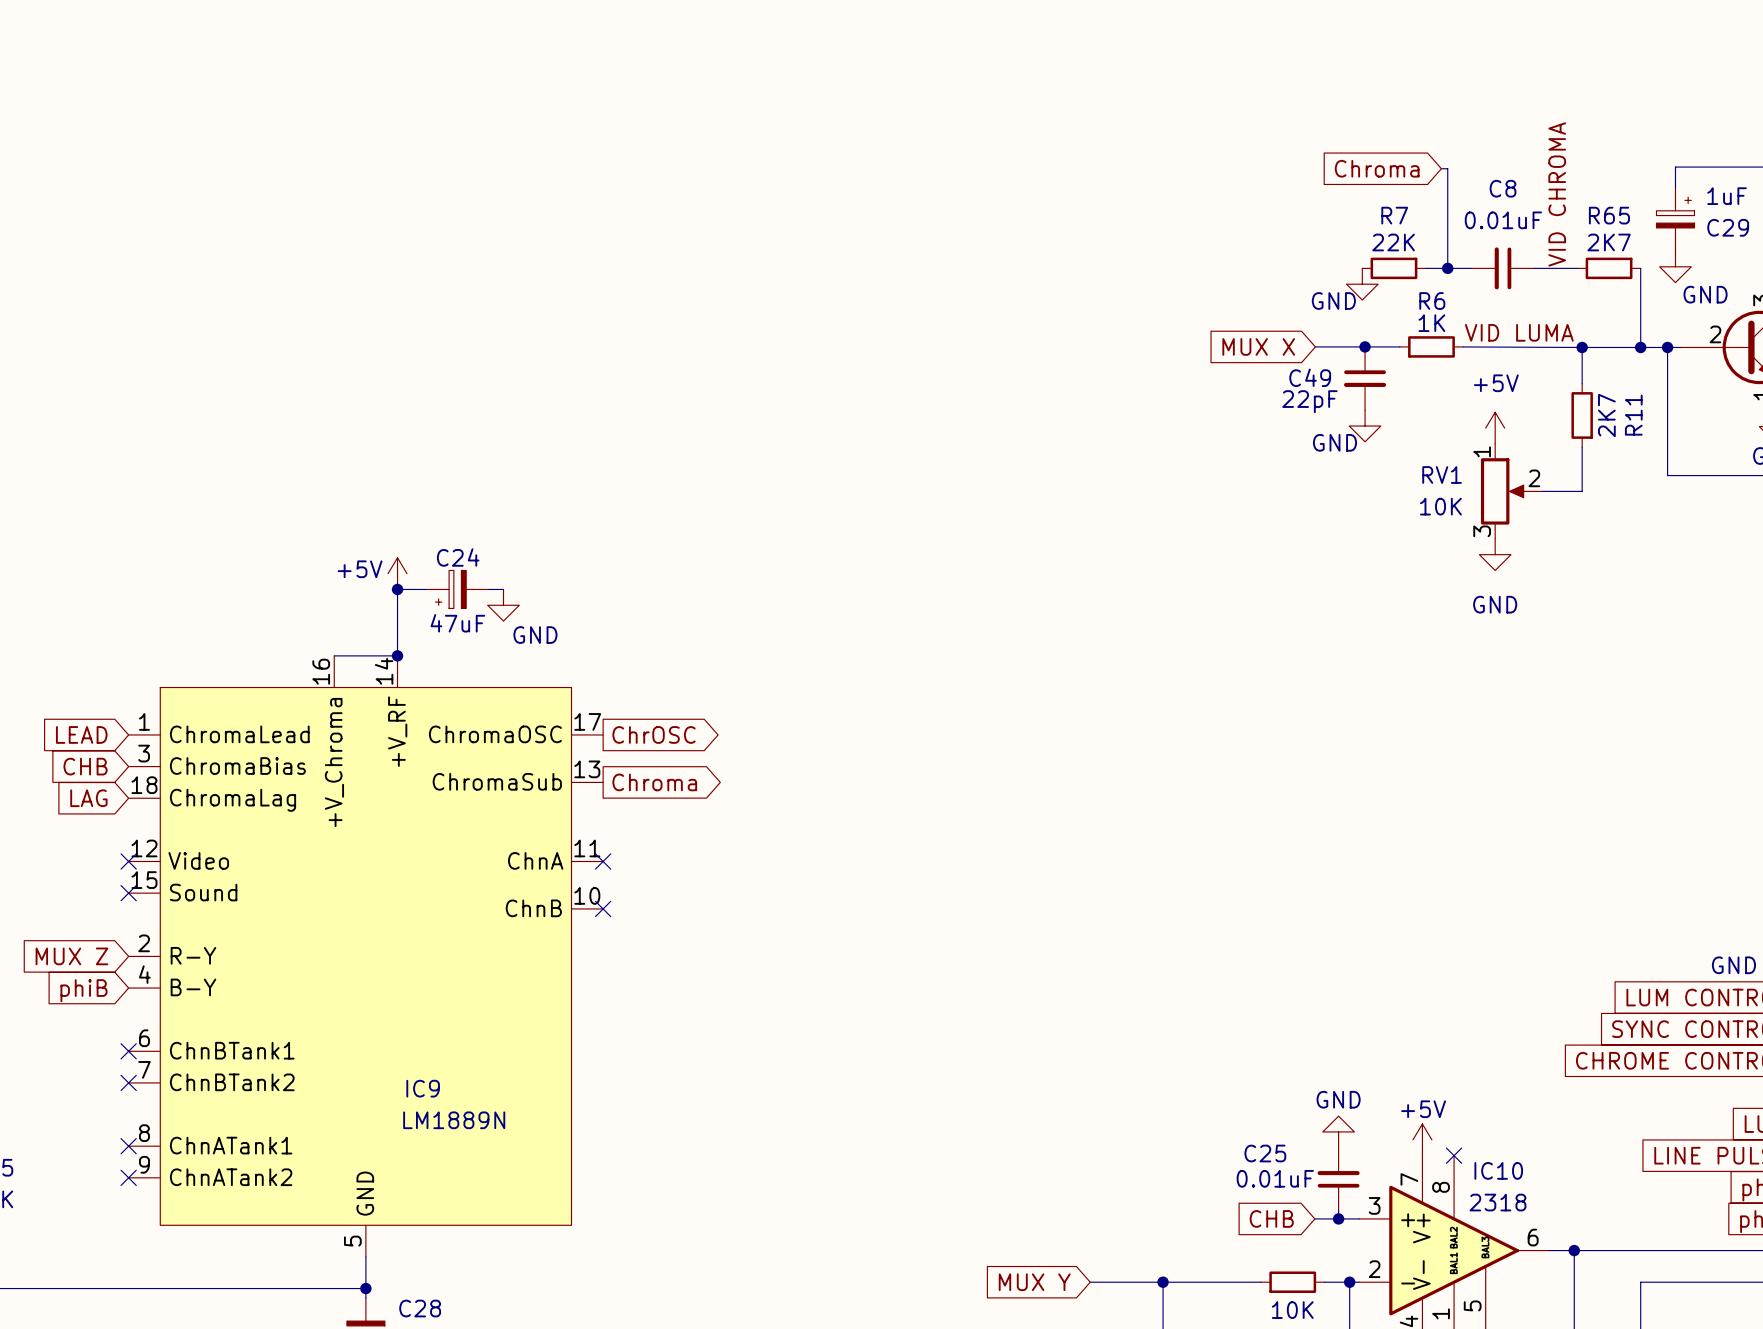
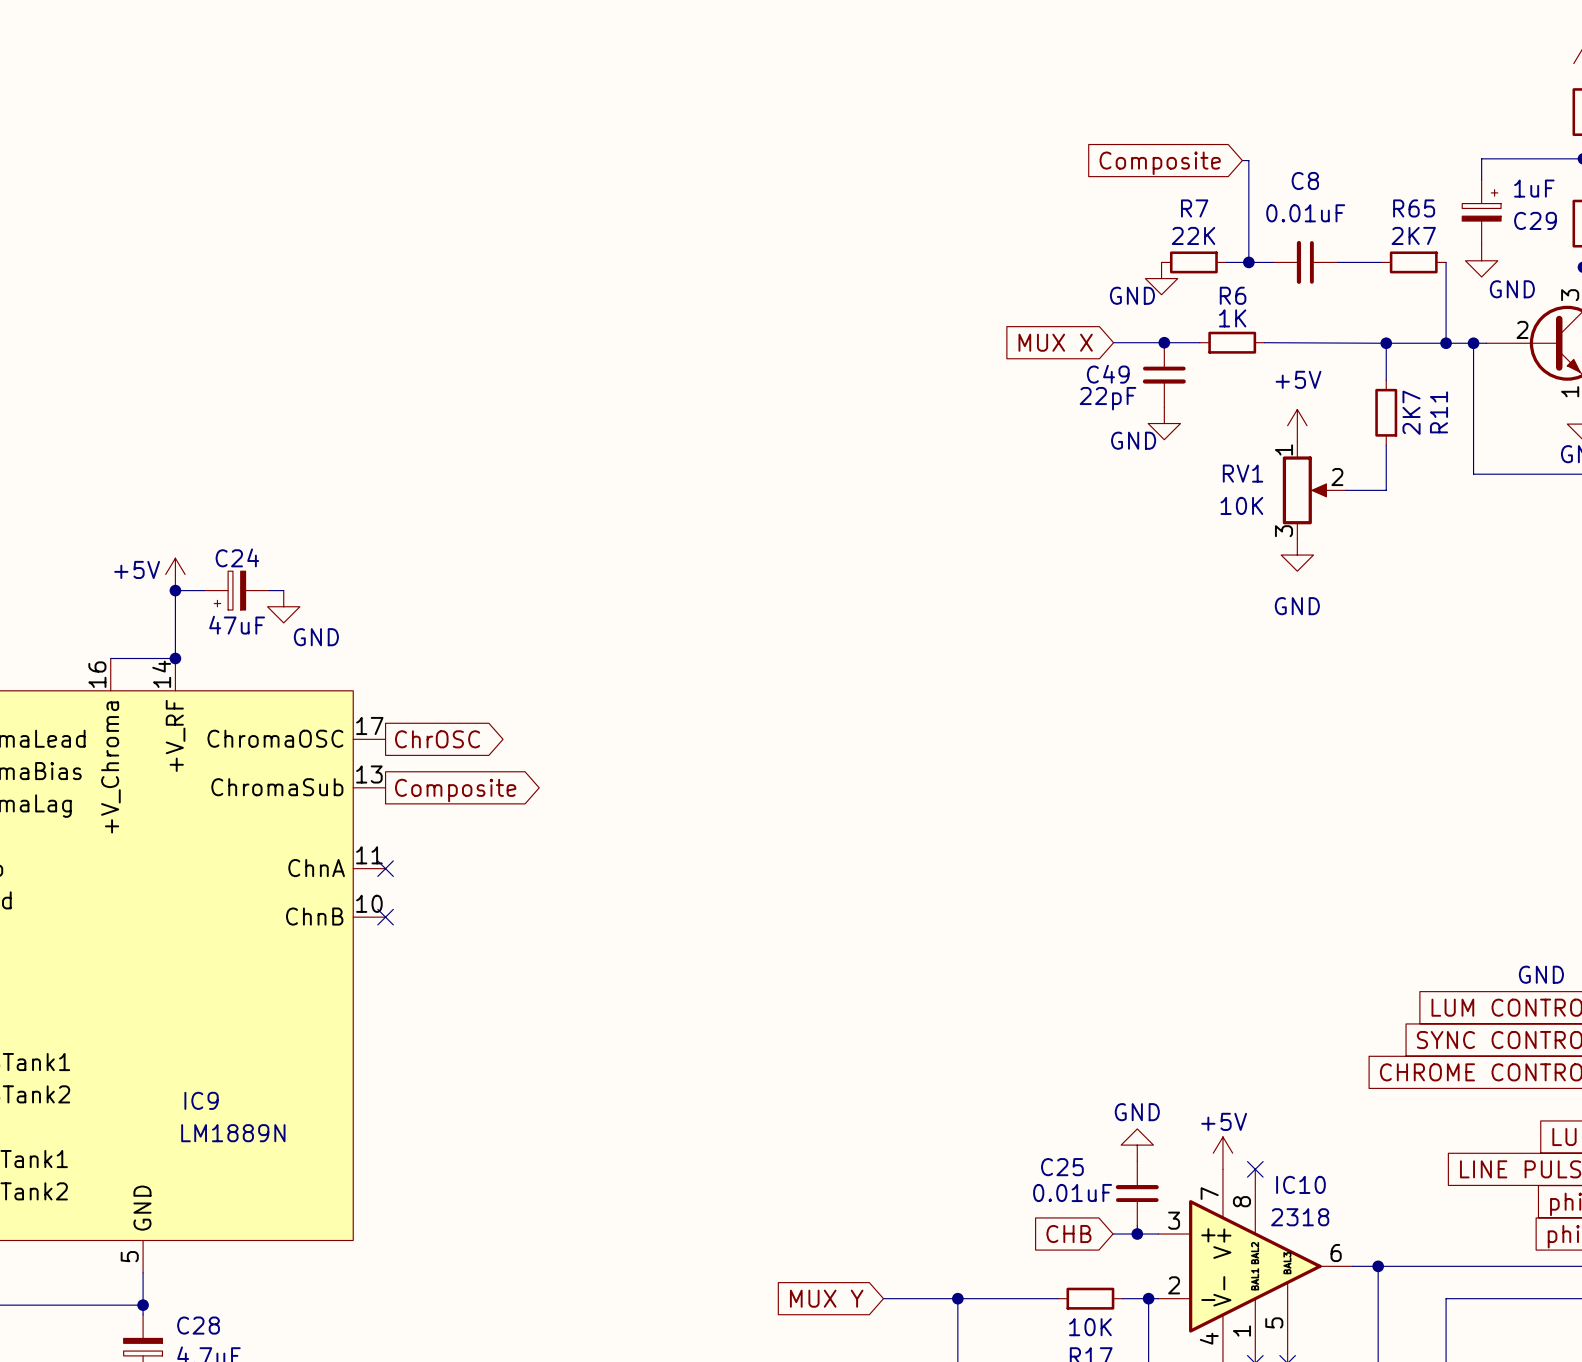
global label: Chroma (1377, 168) -> Composite (1160, 163)
label: VID CHROMA (1557, 194) -> none
label: VID LUMA (1519, 332) -> none
global label: Chroma (654, 782) -> Composite (455, 790)

